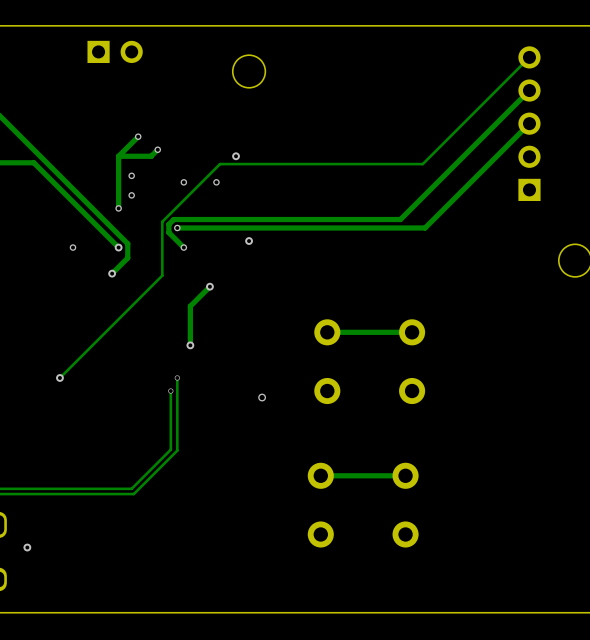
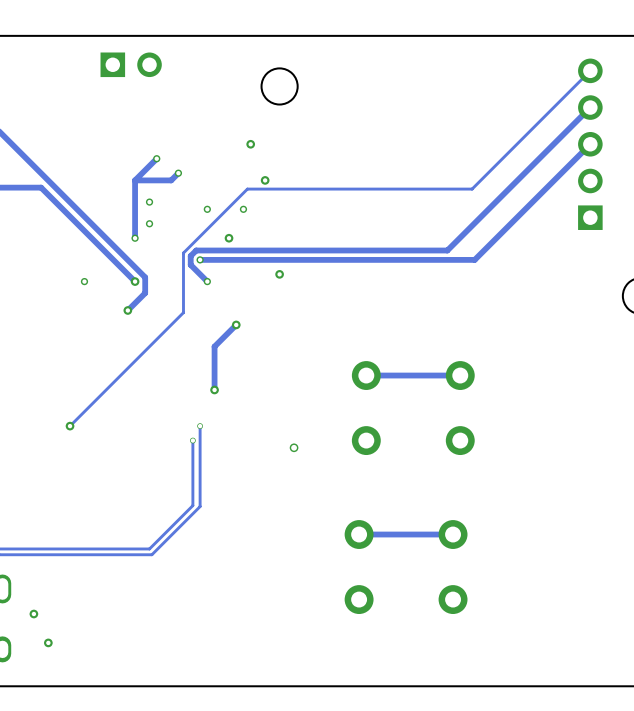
via: none -> (250, 144)
via: none -> (229, 238)
via: none -> (48, 642)

